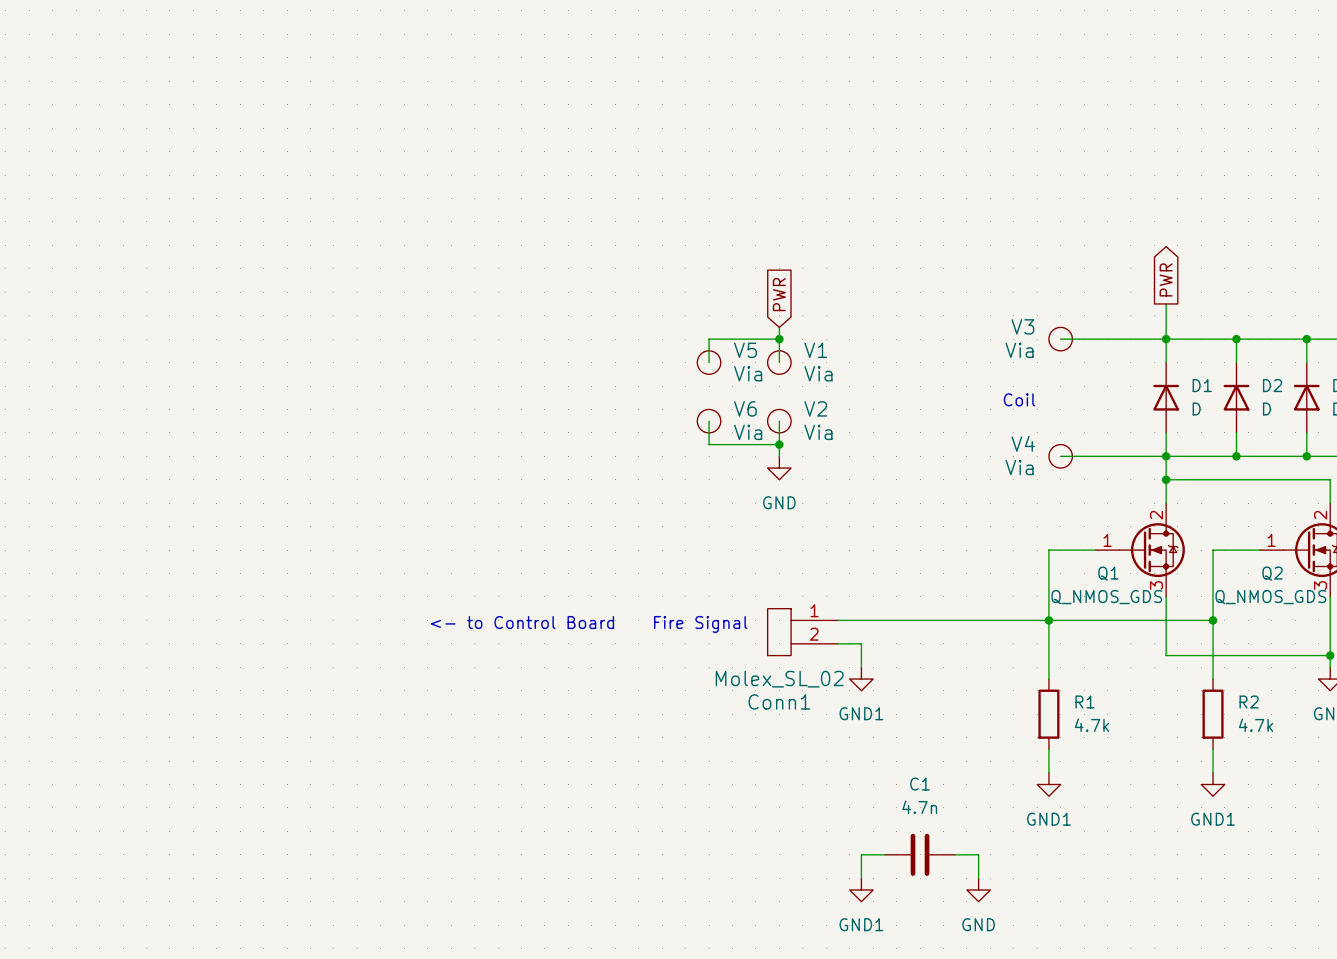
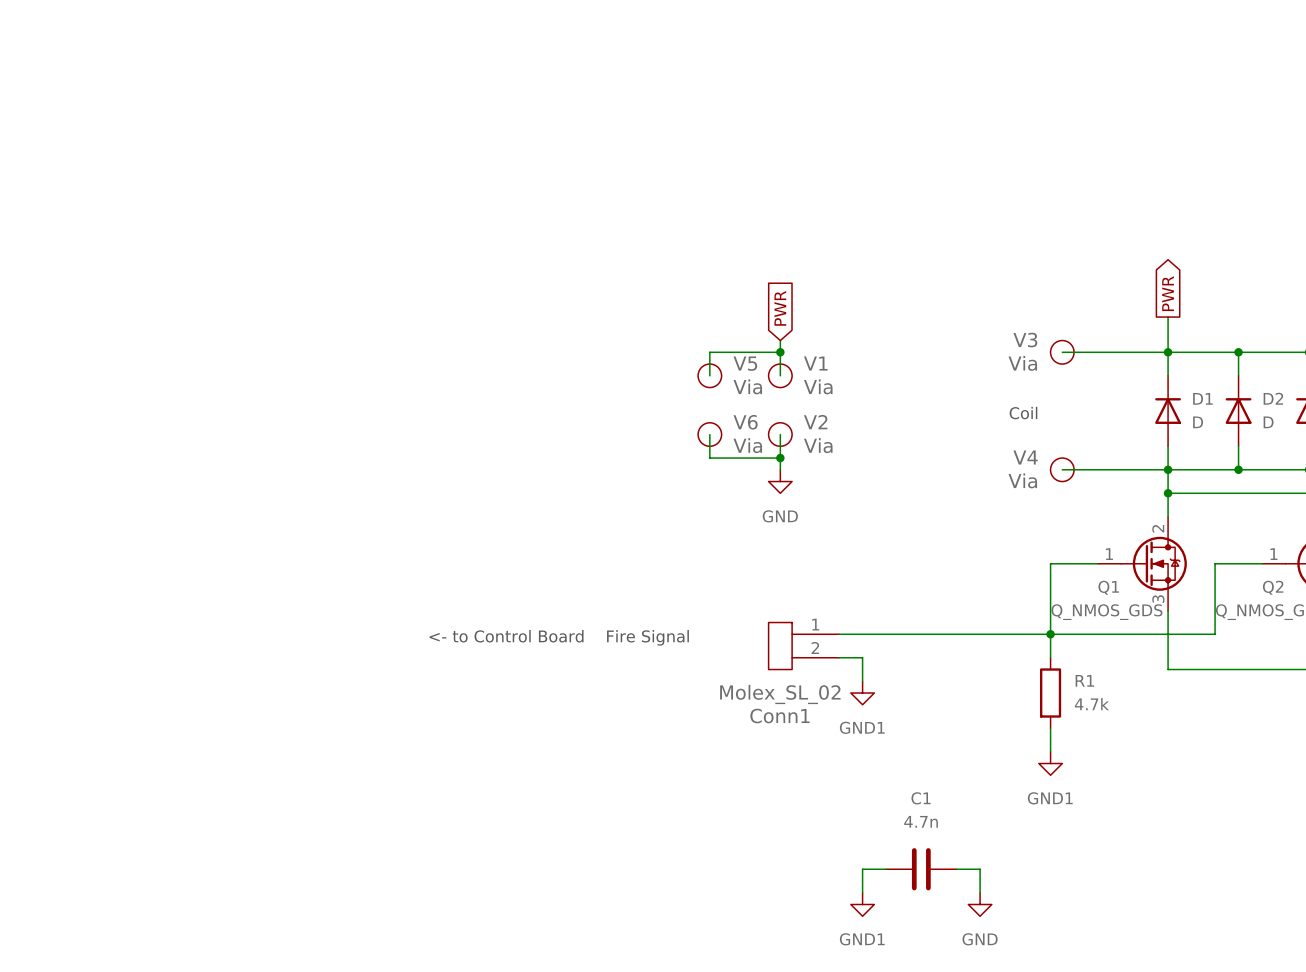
wire: (1213, 620) (1213, 679) -> none
junction: (1213, 620) -> none
wire: (1048, 643) (1048, 679) -> none
R1 position: (1048, 714) -> (1050, 693)
R2: 4.7k (1213, 714) -> none
wire: (1048, 749) (1048, 772) -> (1050, 728) (1050, 751)
wire: (1213, 749) (1213, 772) -> none
power symbol position: GND1 (1048, 784) -> GND1 (1050, 763)
power symbol: GND1 (1213, 784) -> none

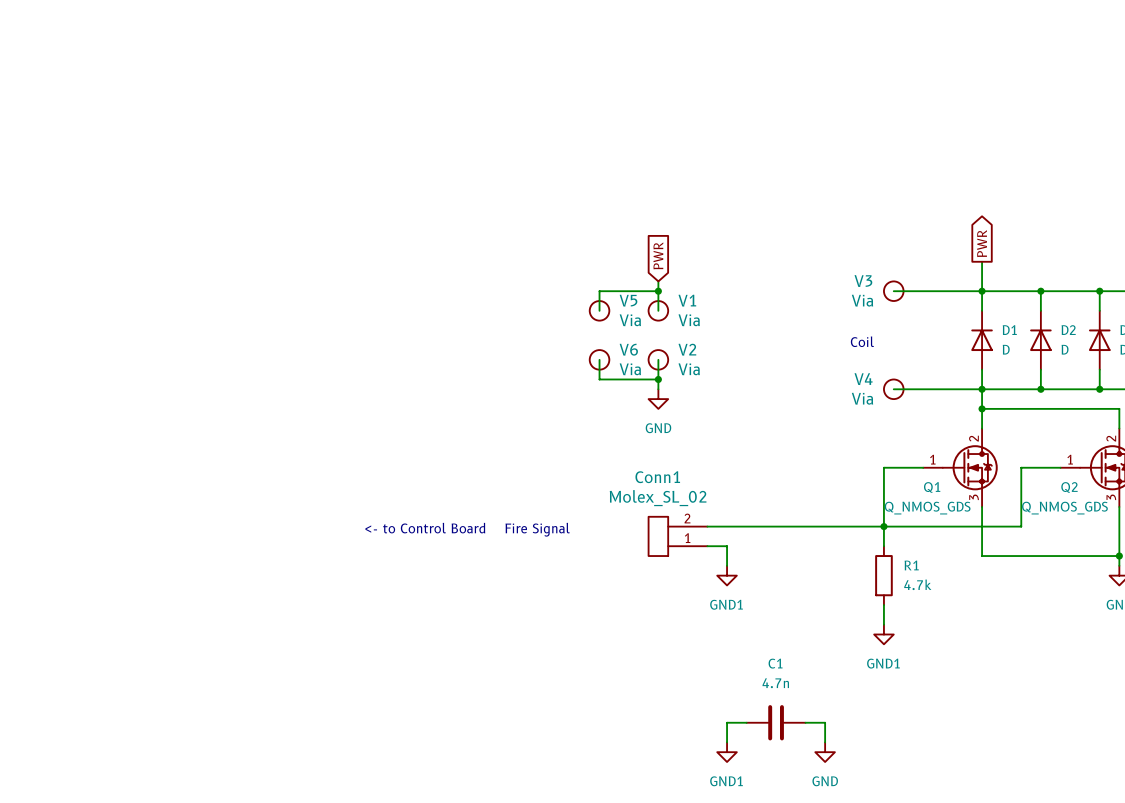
Conn1 flip: as is (780, 646) -> up-down (658, 536)

